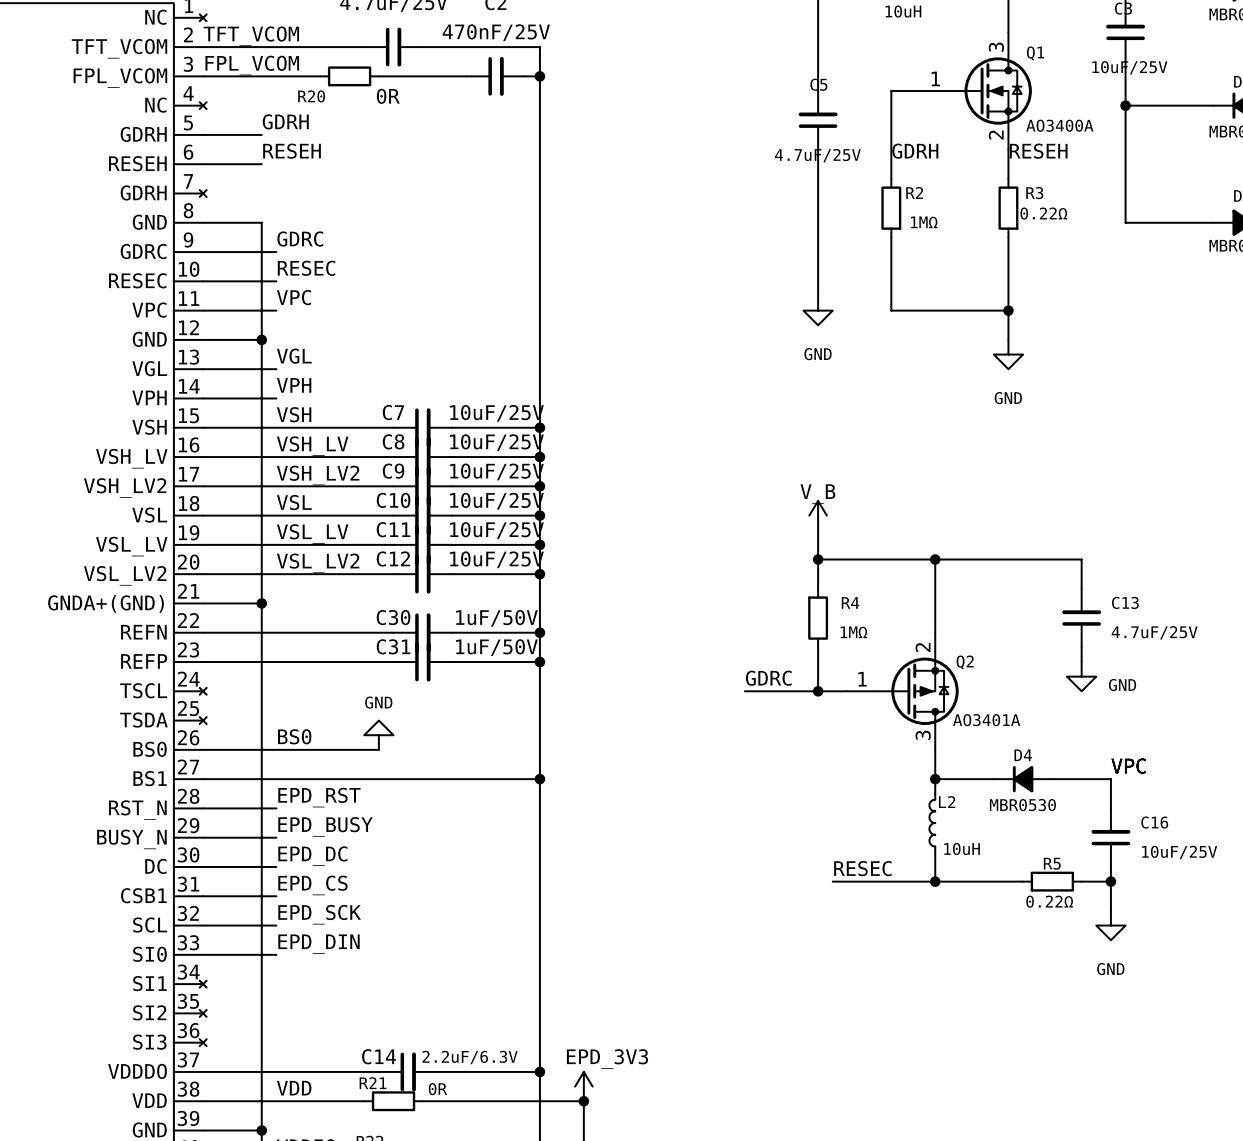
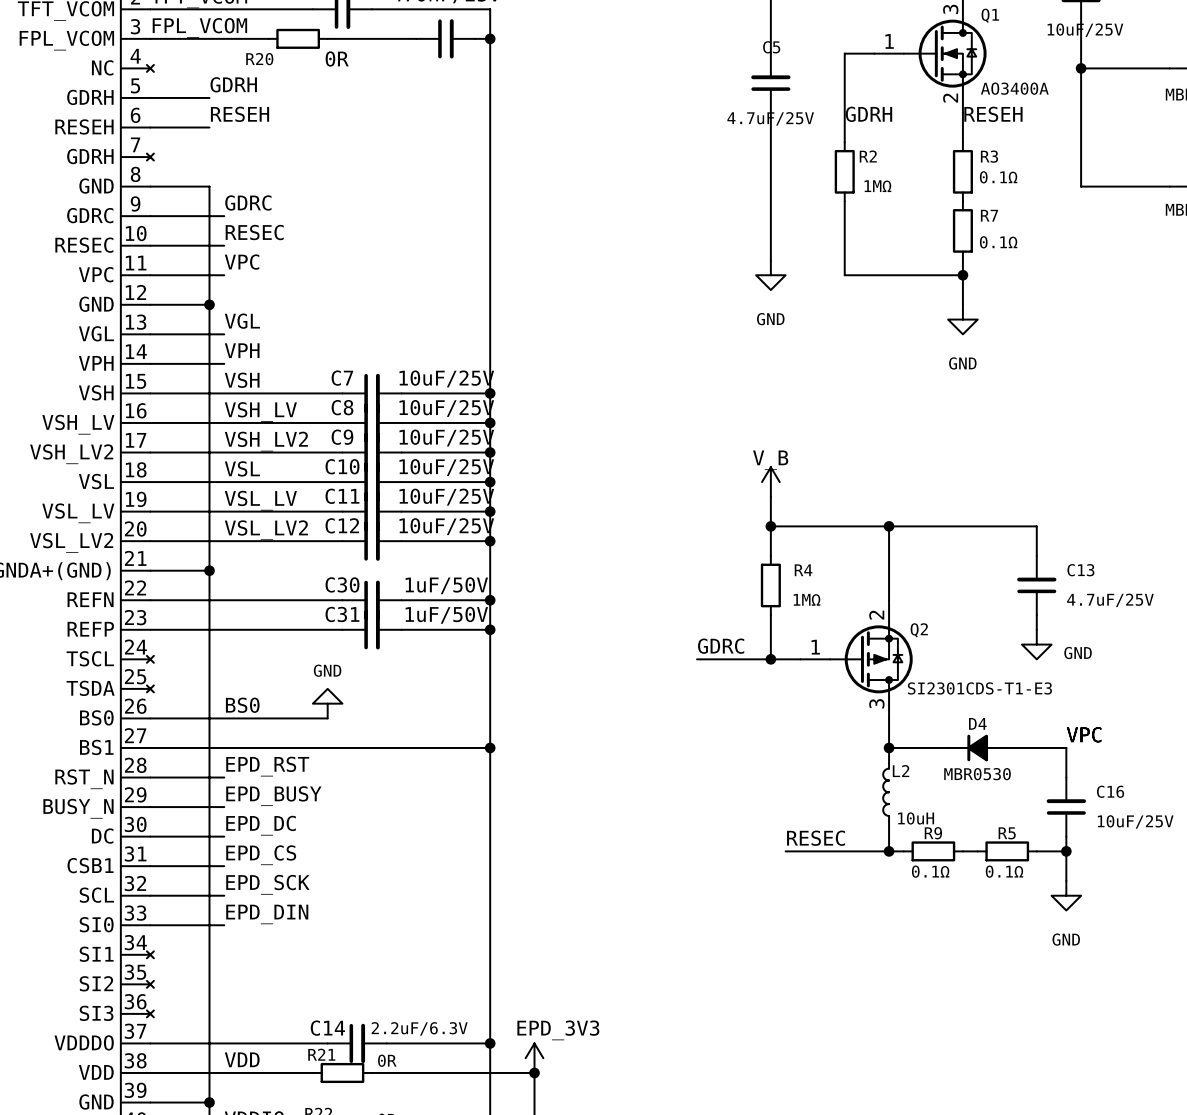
R3 value: 0.22Ω (1043, 213) -> 0.1Ω (998, 177)
wire: (1008, 237) (1008, 295) -> none
R7: none -> 0.1Ω (962, 230)
Q2 value: AO3401A (986, 720) -> SI2301CDS-T1-E3 (979, 688)
wire: (949, 881) (1008, 881) -> none
R9: none -> 0.1Ω (933, 851)
R5 value: 0.22Ω (1049, 901) -> 0.1Ω (1004, 871)

